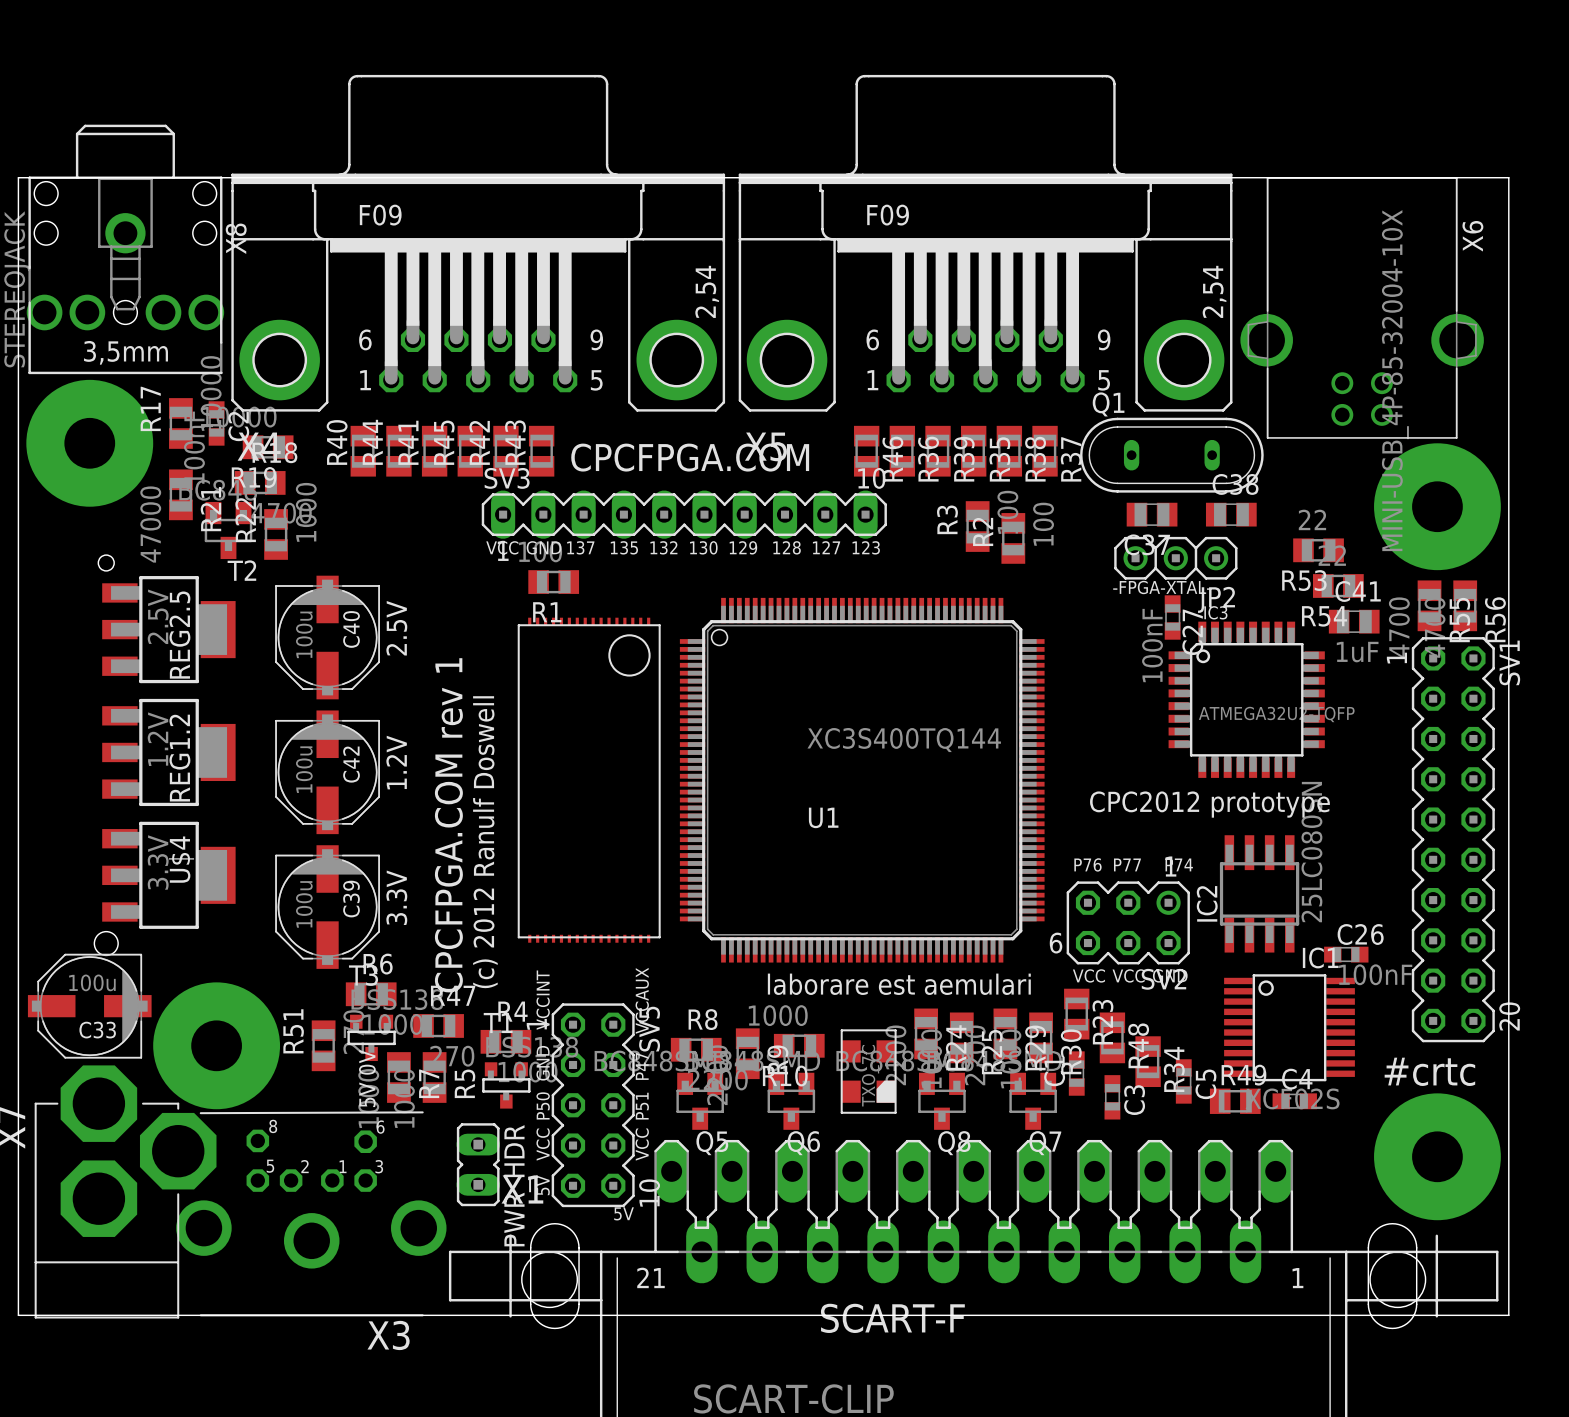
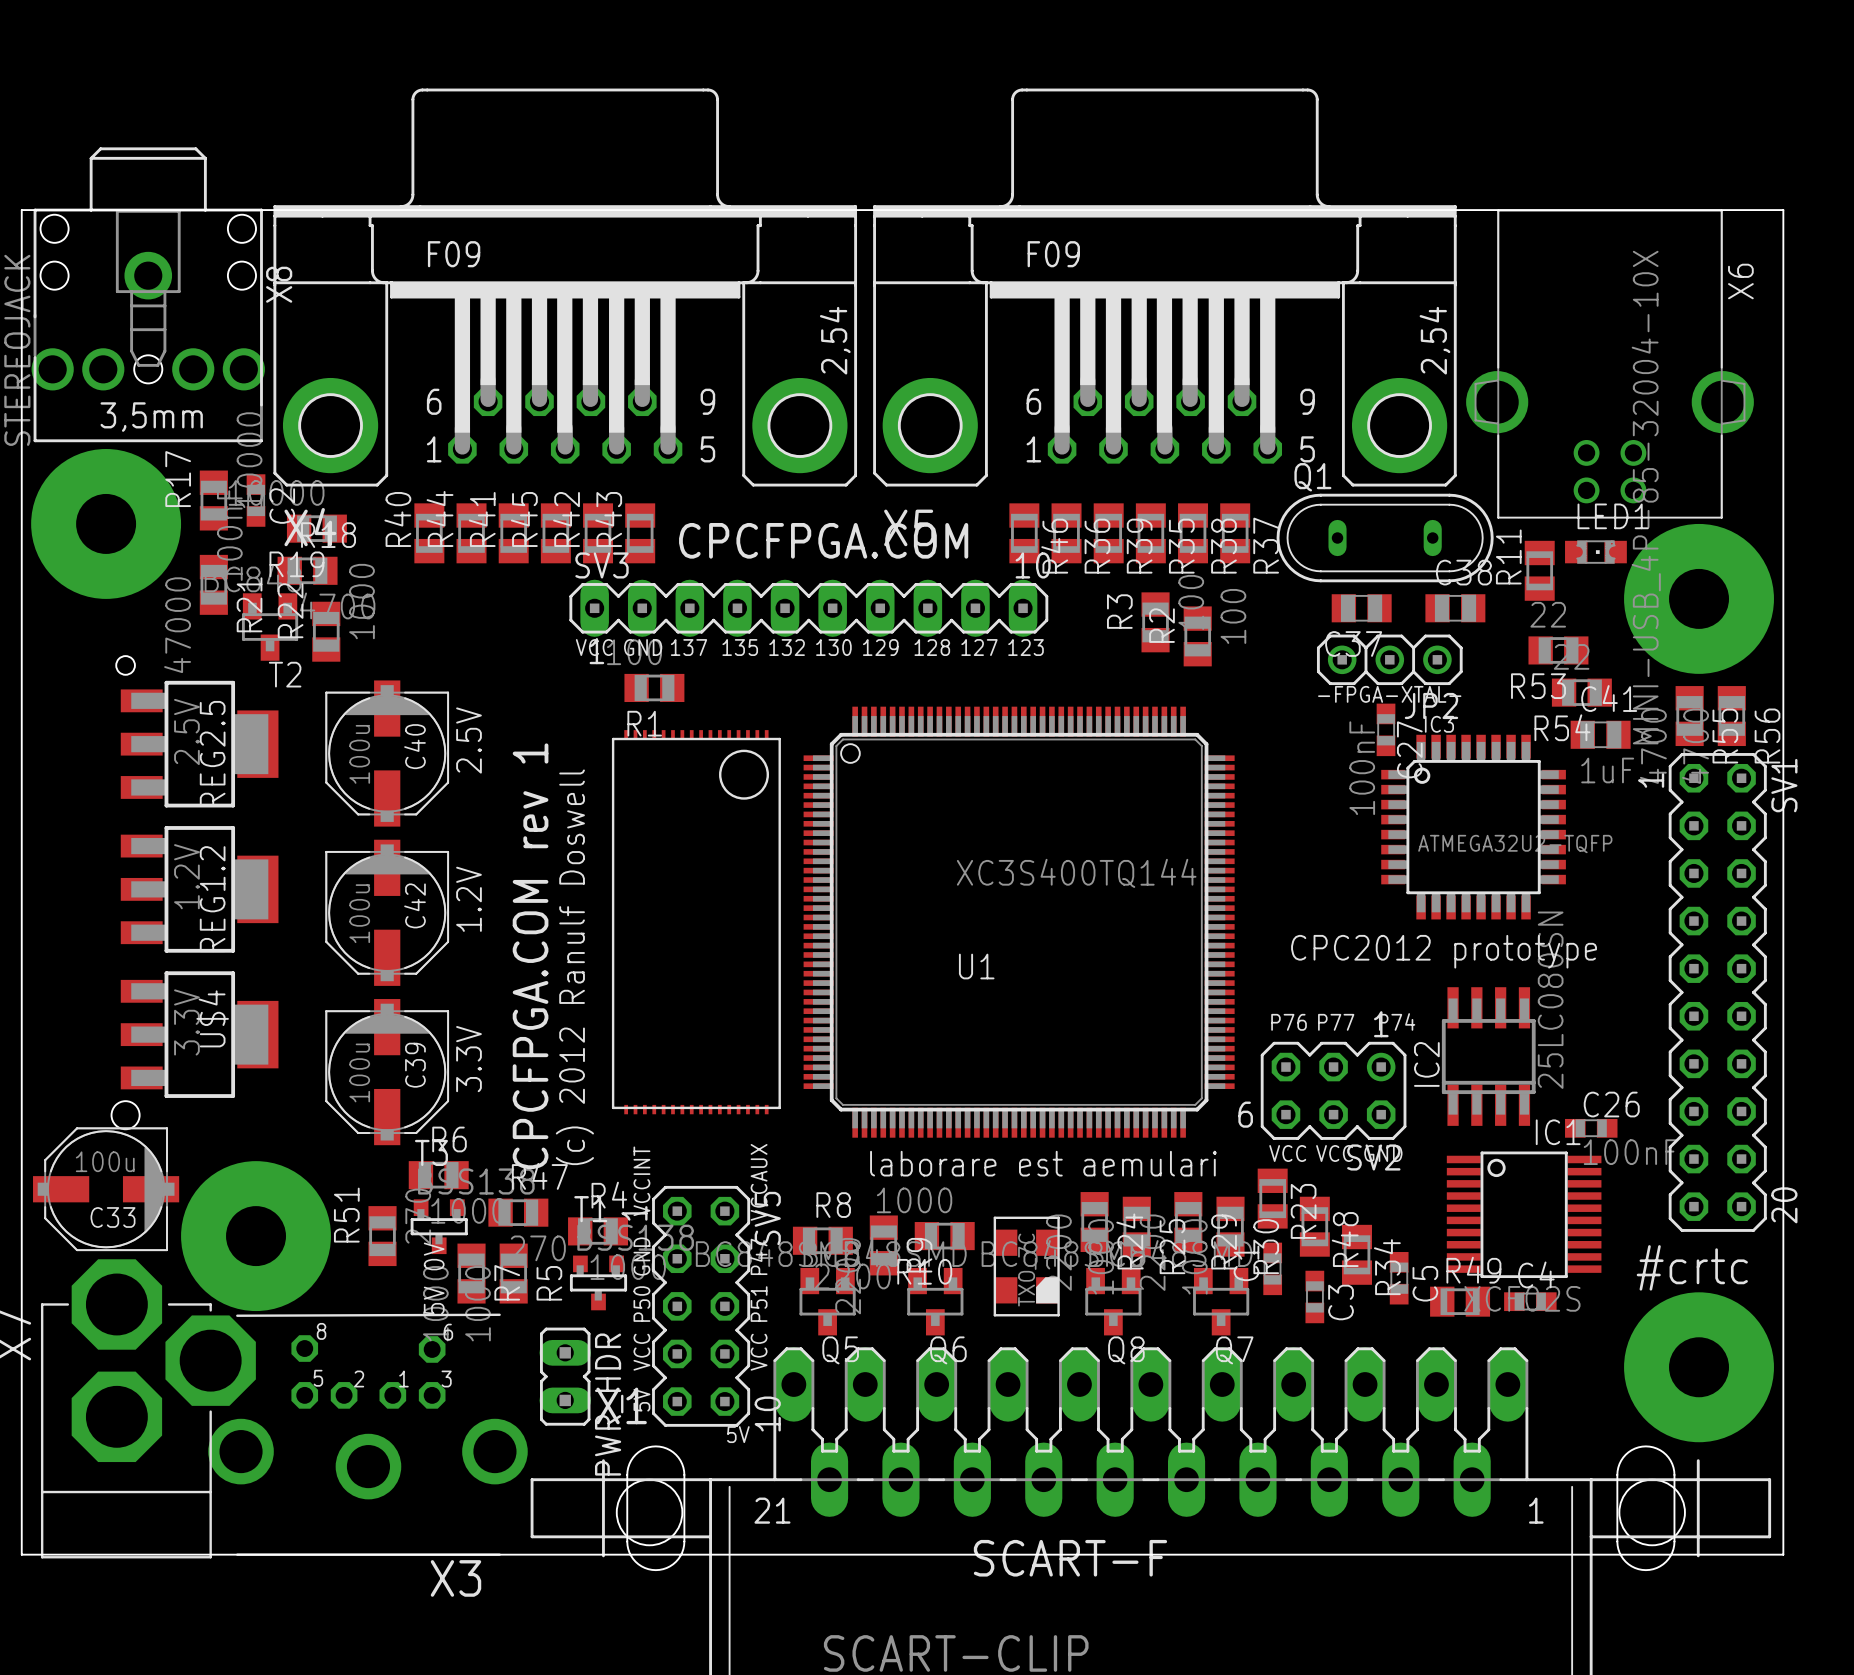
LED1: none -> (1595, 552)
R11: none -> (1539, 570)

